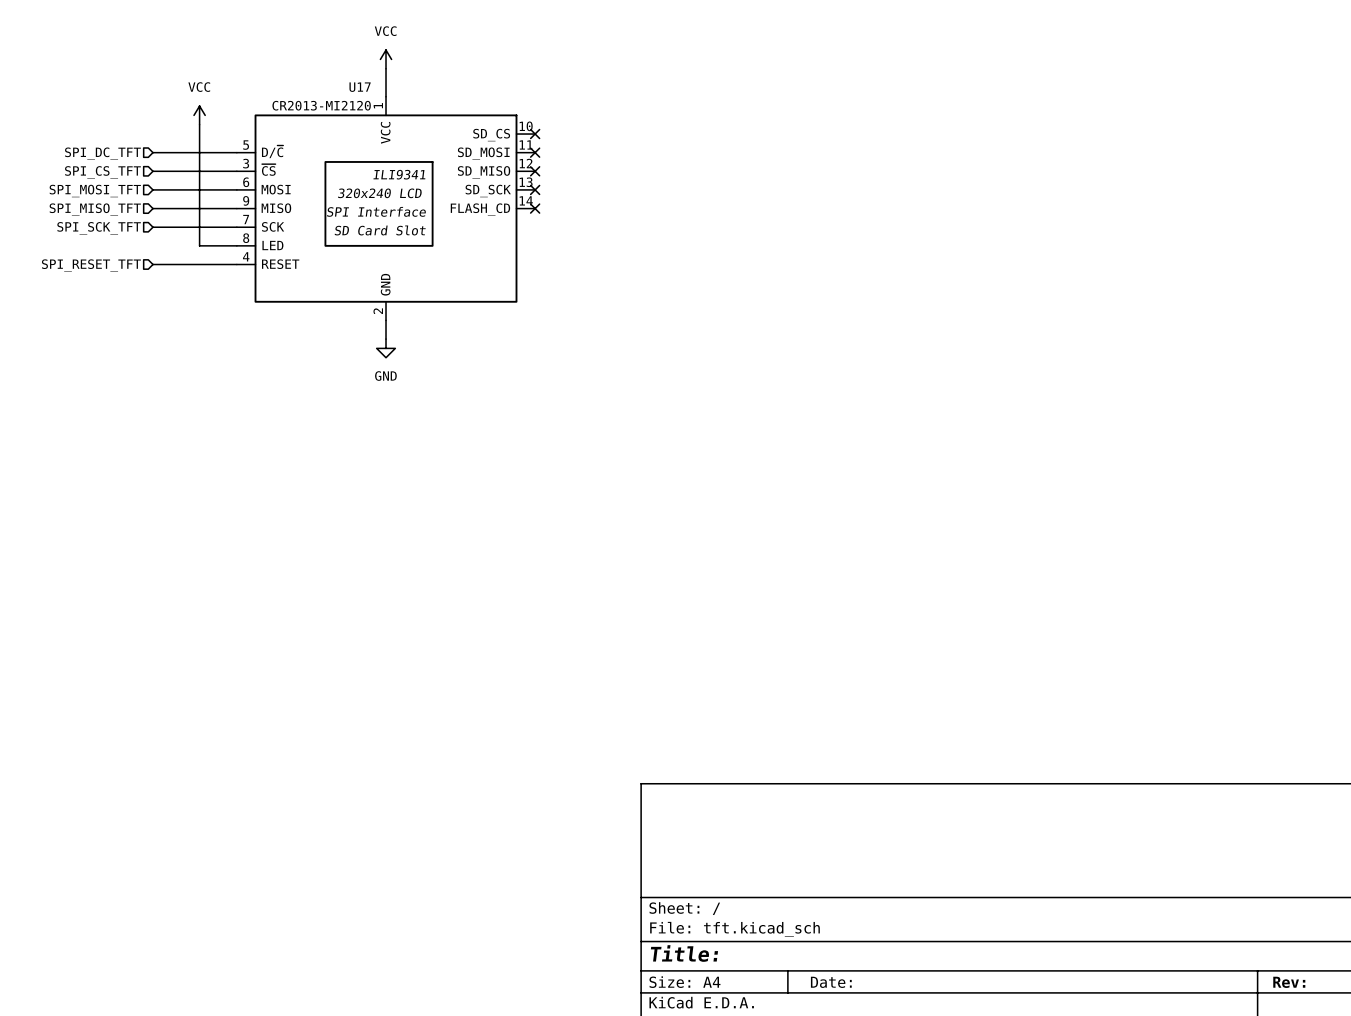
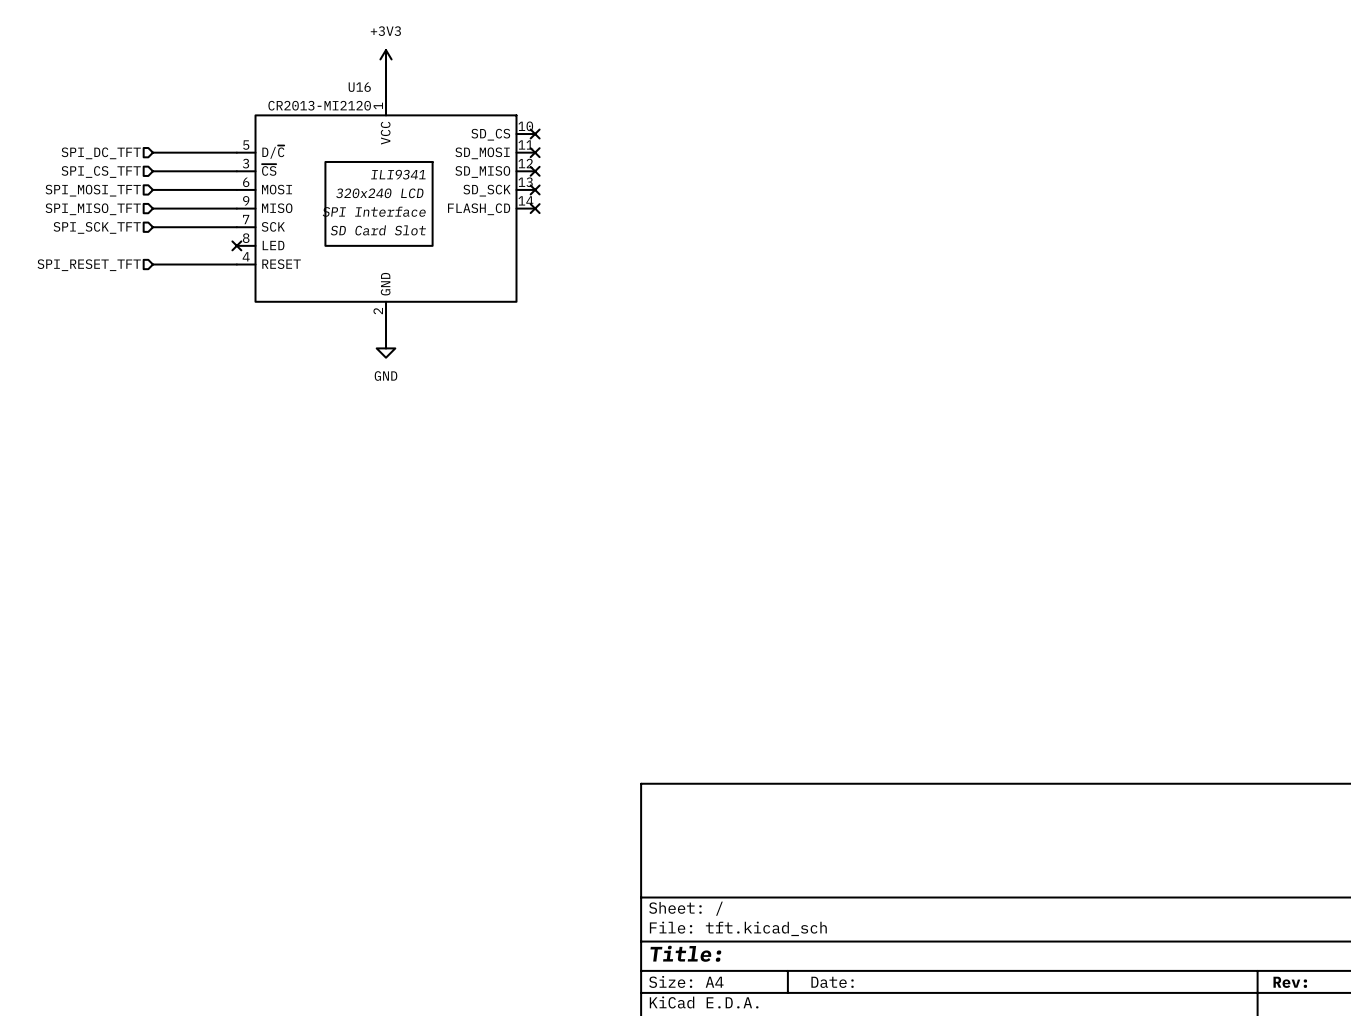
power symbol: VCC (386, 59) -> +3V3 (386, 59)
U17 name: U17 (360, 87) -> U16 (359, 87)
power symbol: VCC (199, 115) -> none
wire: (199, 124) (199, 245) (236, 245) -> none
no-connect mark: none -> (236, 245)

